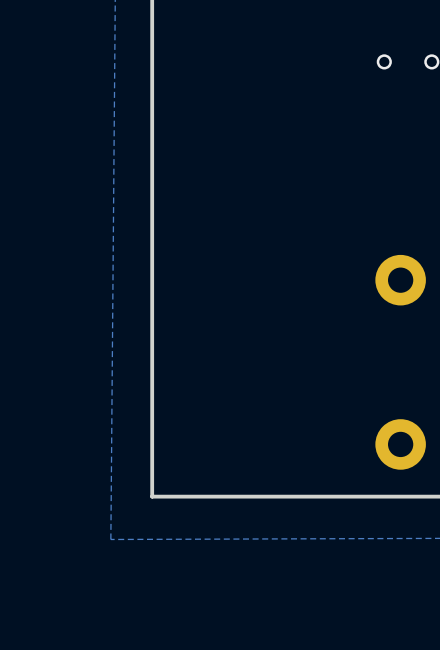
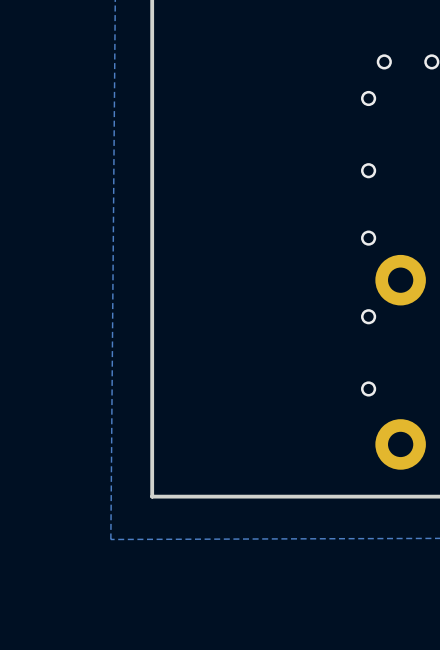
via: none -> (368, 98)
via: none -> (368, 170)
via: none -> (368, 238)
via: none -> (368, 316)
via: none -> (368, 388)

